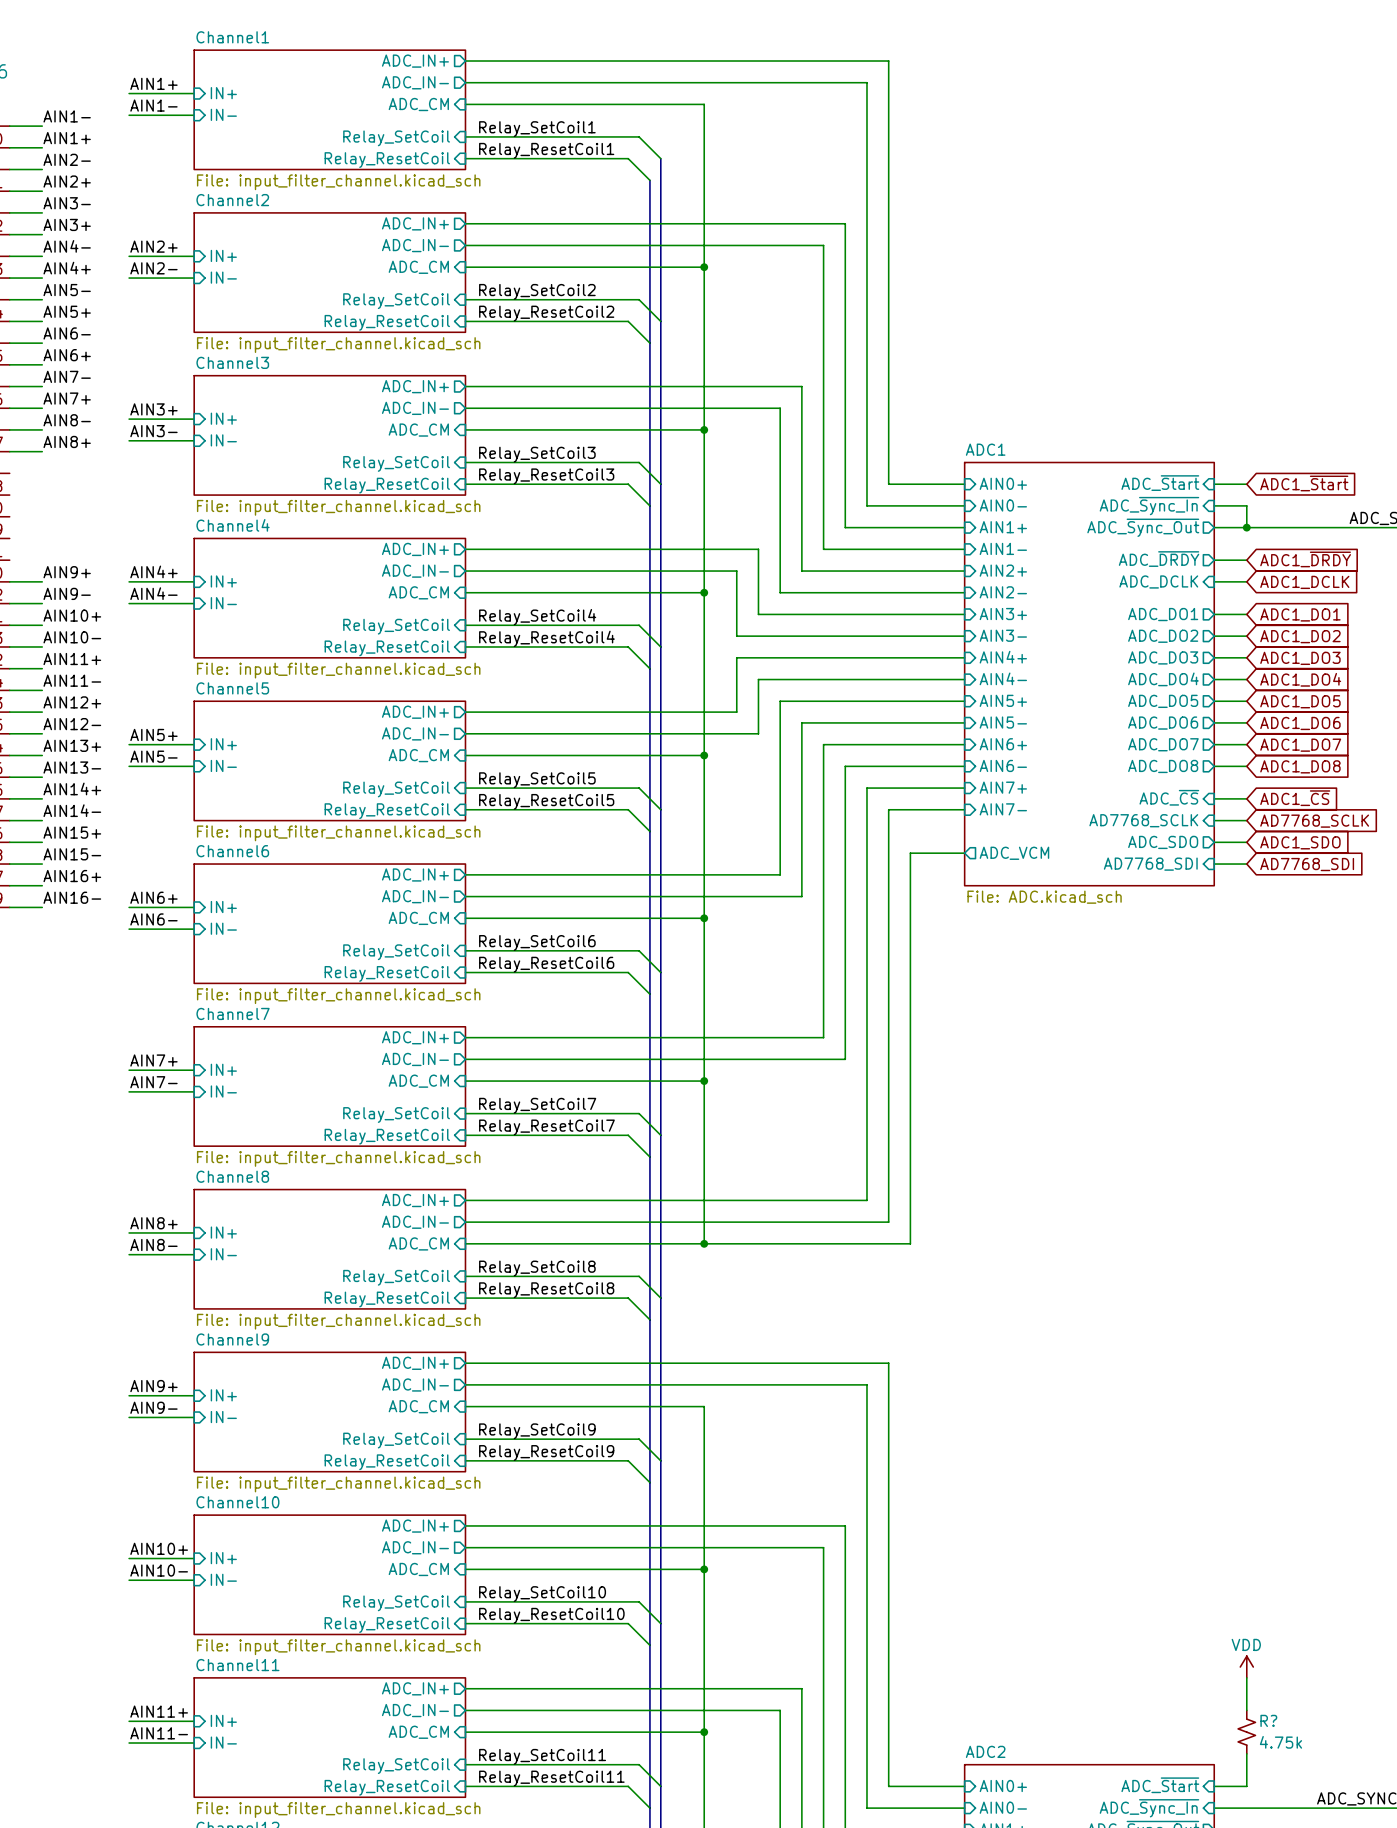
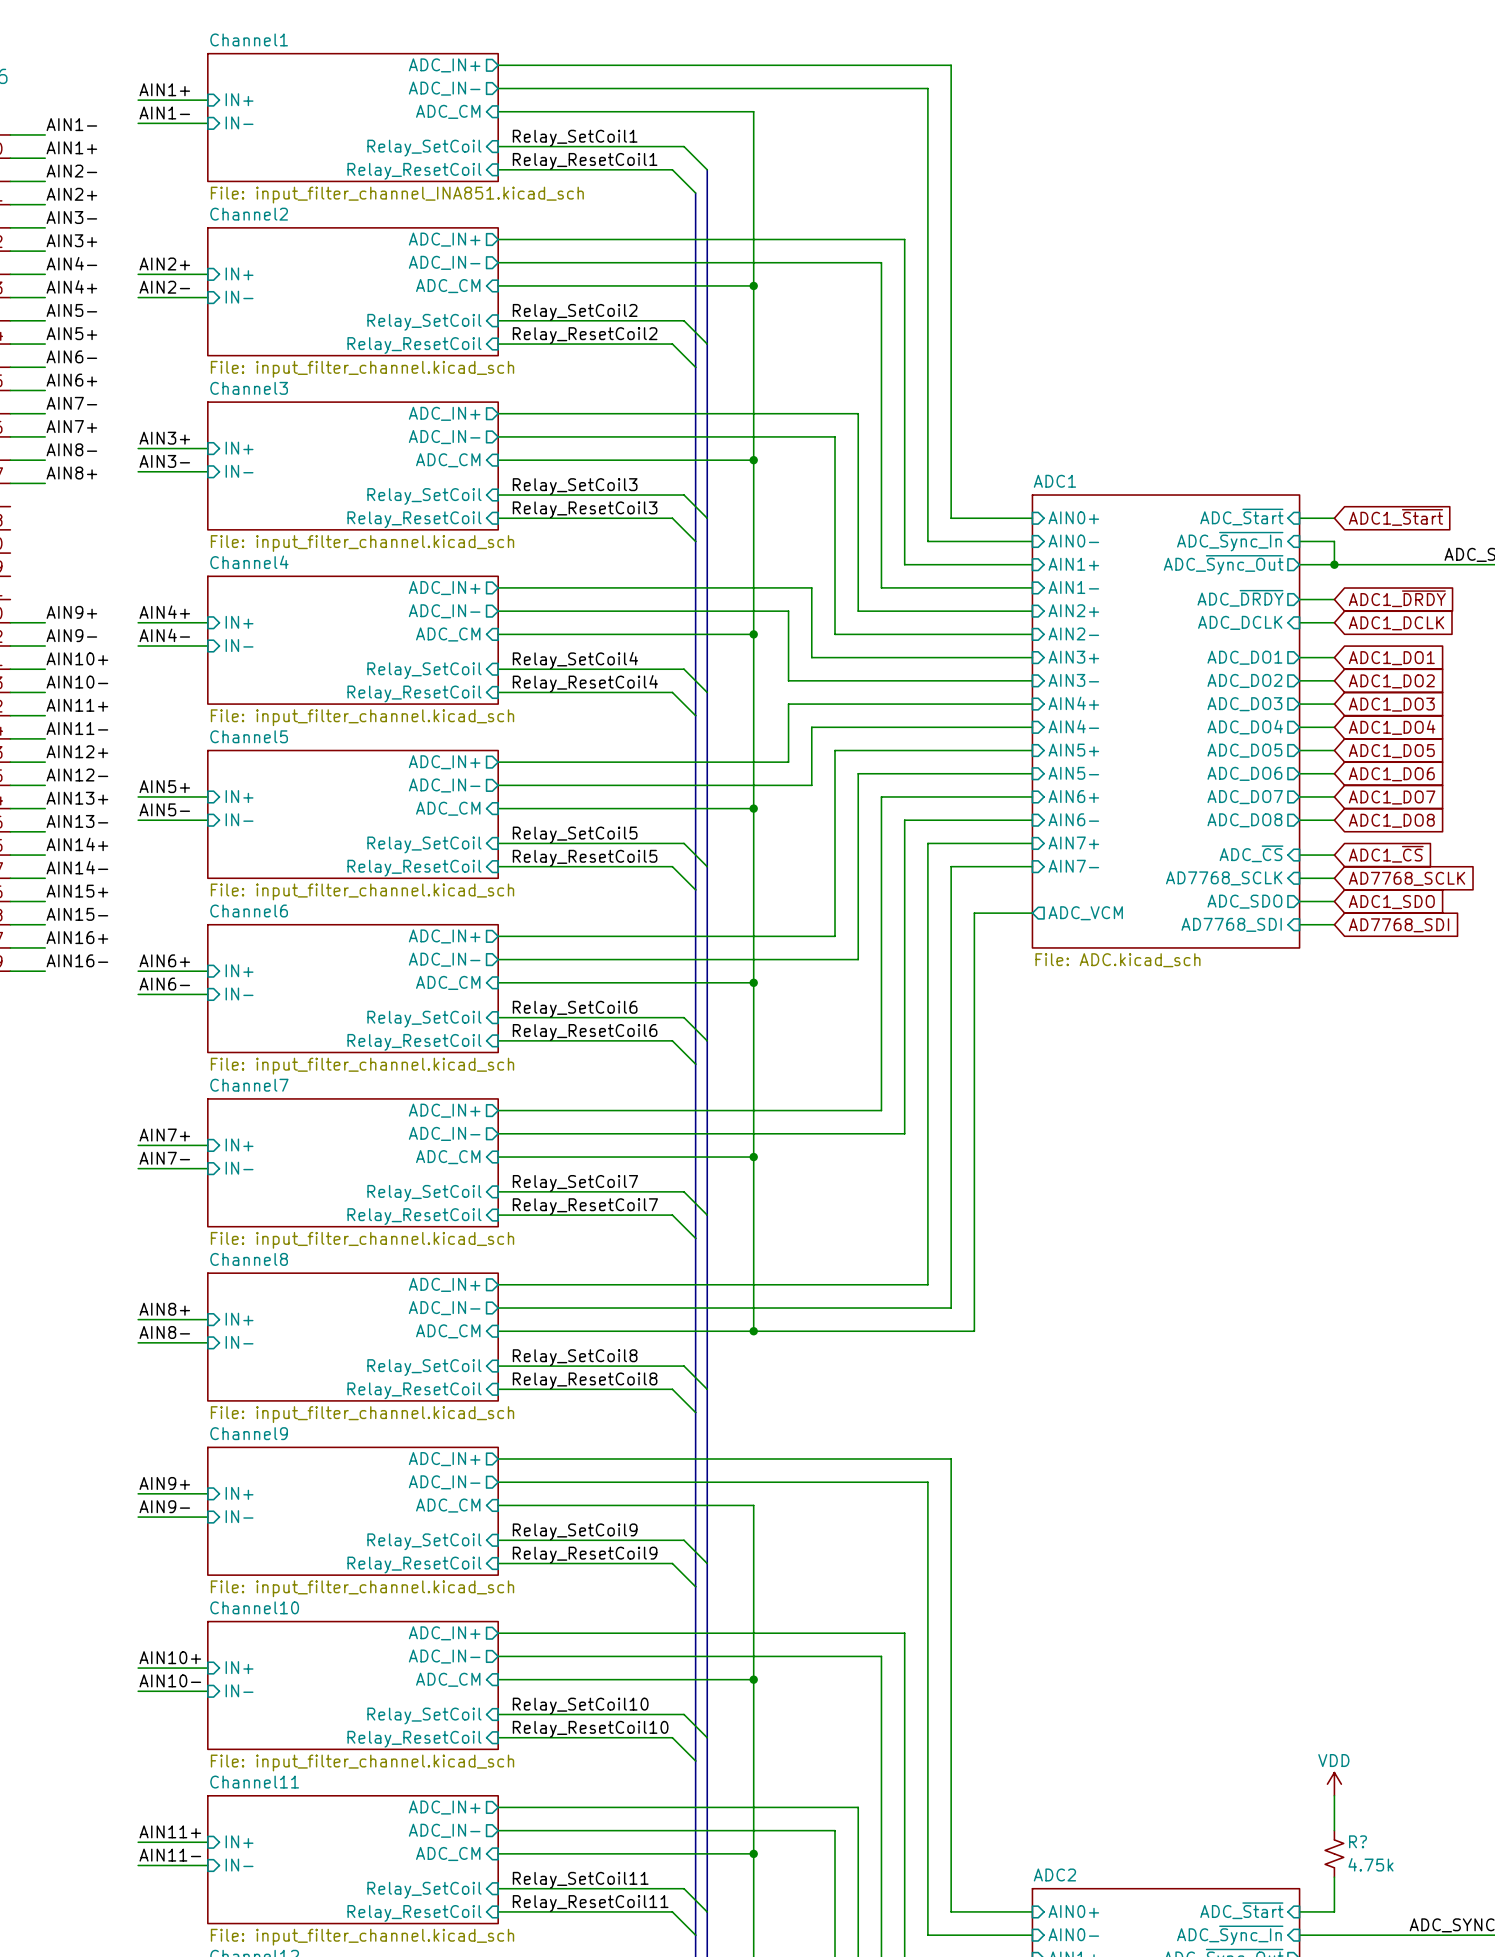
sheet Channel1 value: File: input_filter_channel.kicad_sch (338, 182) -> File: input_filter_channel_INA851.kicad_sch (397, 195)

